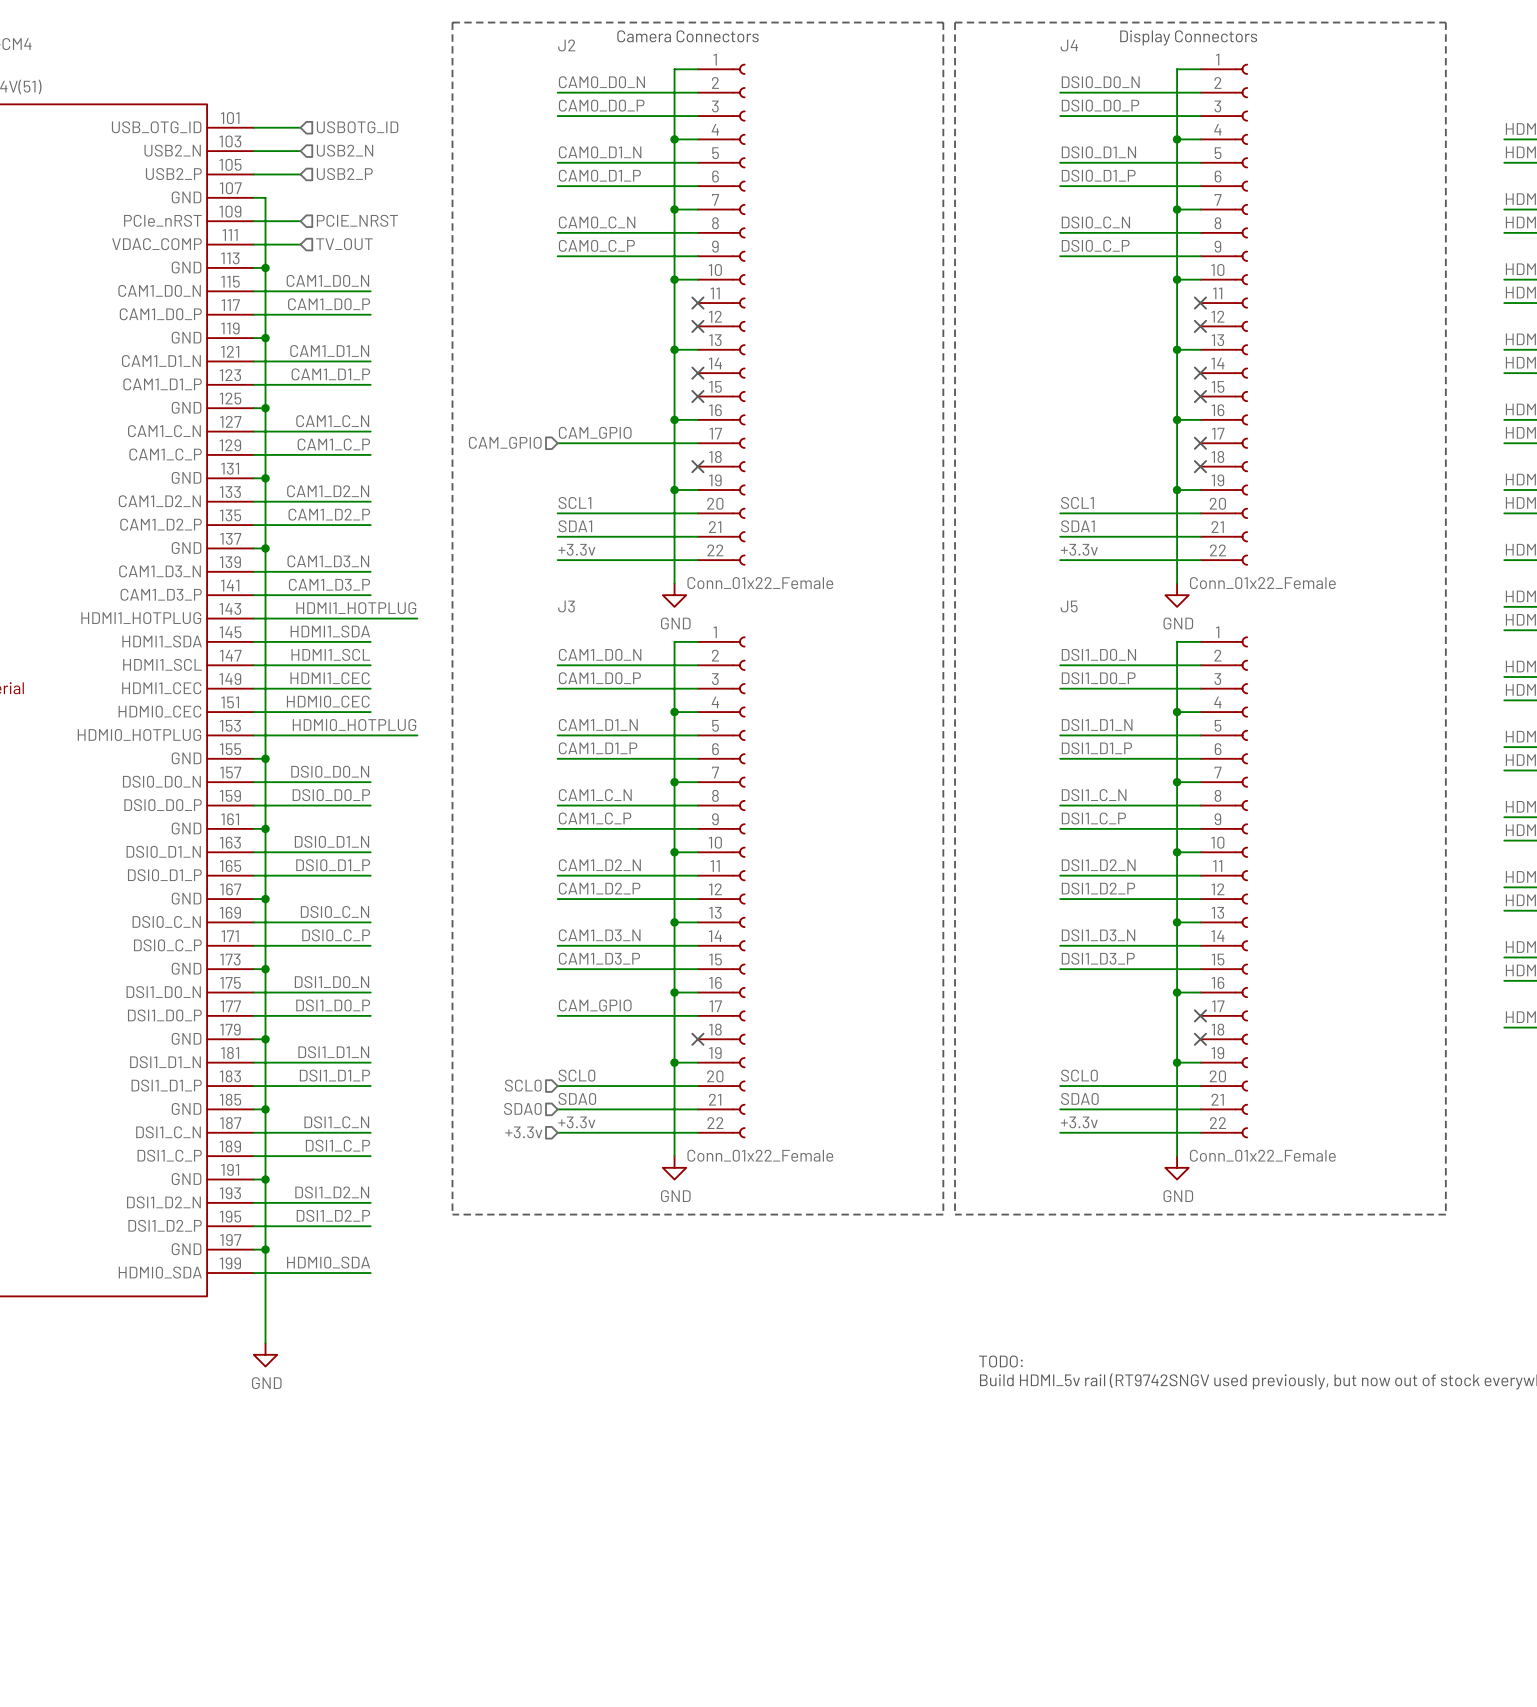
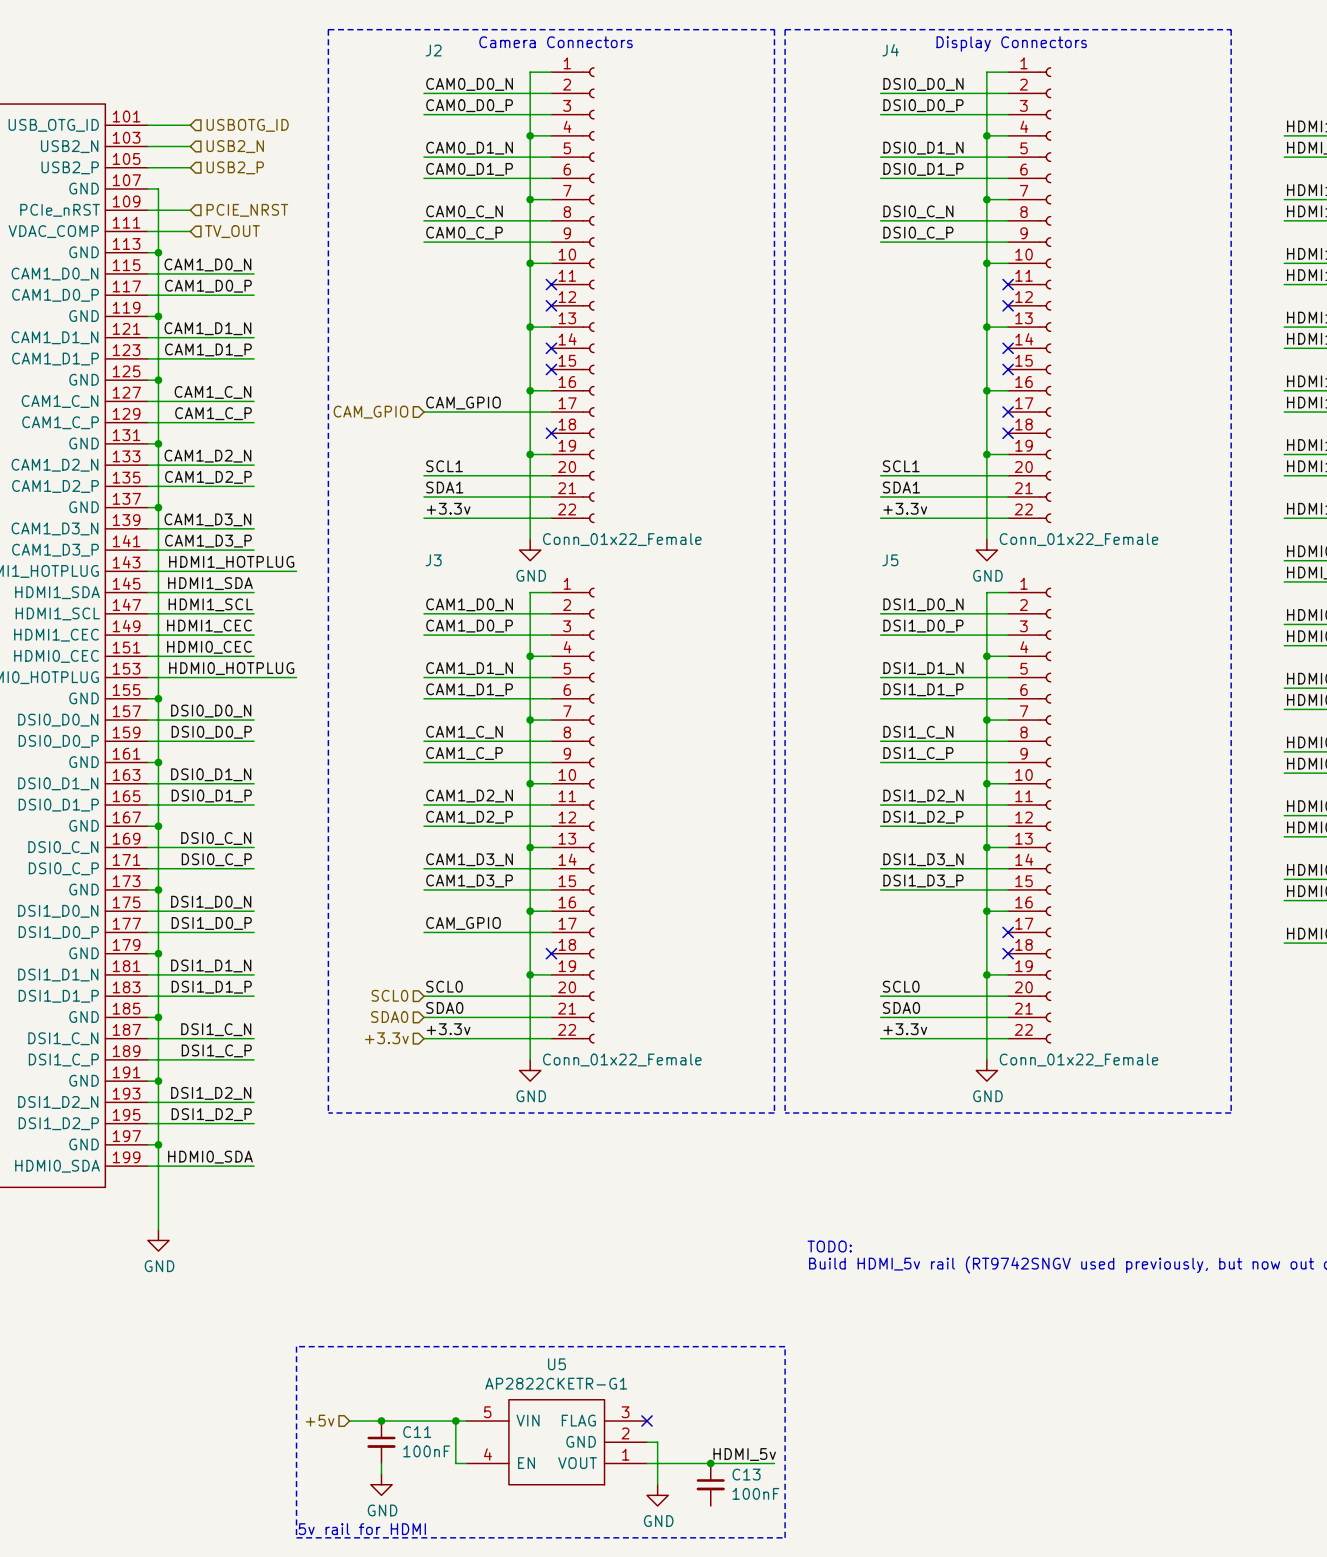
line: none -> (296, 1346) (785, 1346) (785, 1537) (296, 1537) (296, 1346)
hierarchical label: none -> +5v (320, 1420)
wire: none -> (349, 1421) (466, 1421)
junction: none -> (381, 1421)
wire: none -> (455, 1421) (455, 1463) (466, 1463)
junction: none -> (455, 1421)
no-connect mark: none -> (647, 1421)
C11: none -> 100nF (381, 1442)
U5: none -> AP2822CKETR-G1 (556, 1442)
wire: none -> (647, 1442) (657, 1442) (657, 1484)
label: none -> HDMI_5v (744, 1454)
wire: none -> (381, 1463) (381, 1474)
wire: none -> (647, 1463) (774, 1463)
junction: none -> (710, 1463)
power symbol: none -> GND (381, 1484)
C13: none -> 100nF (710, 1484)
power symbol: none -> GND (657, 1495)
text: none -> 5v rail for HDMI (362, 1529)

